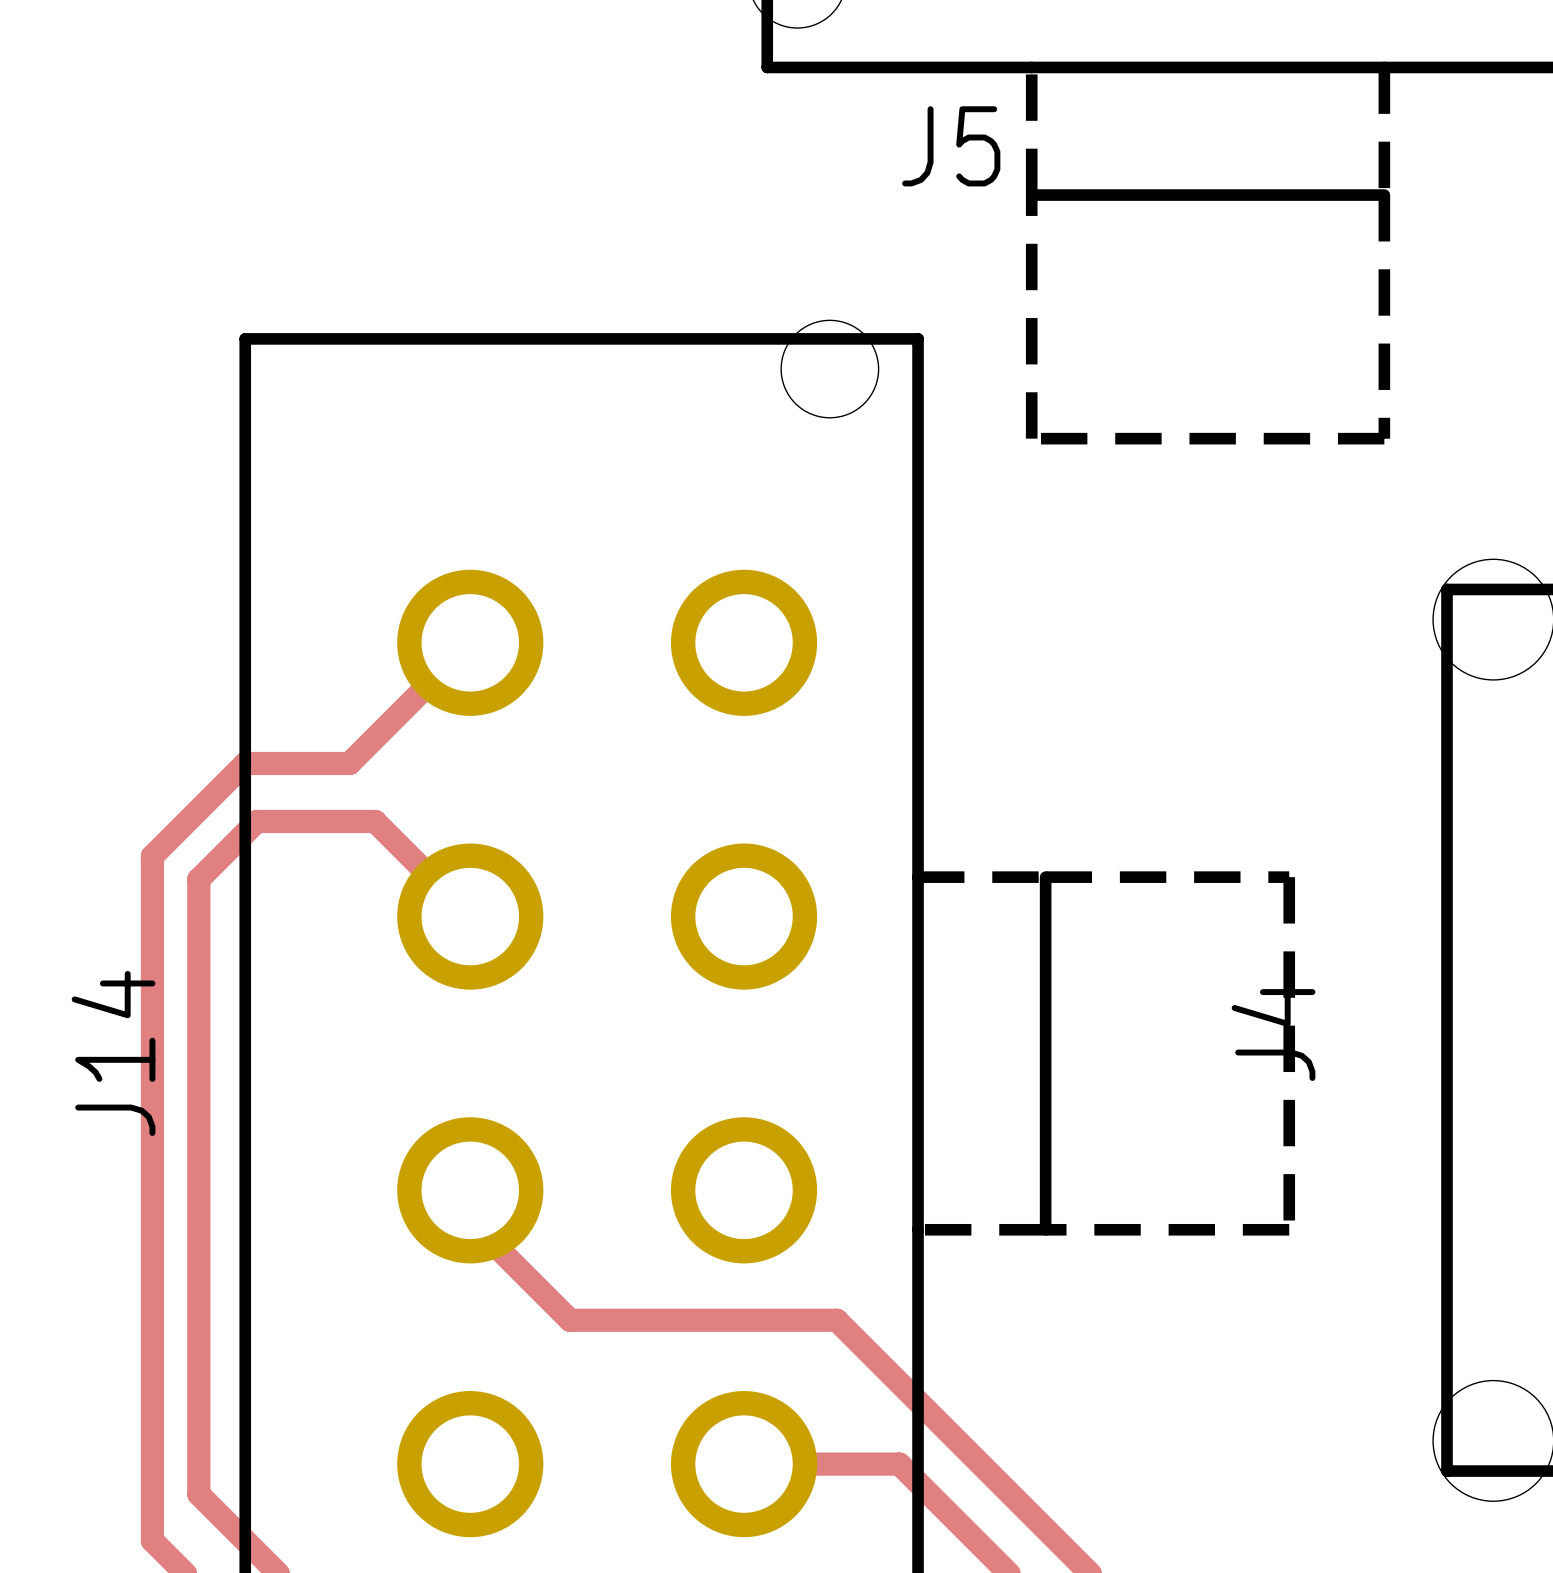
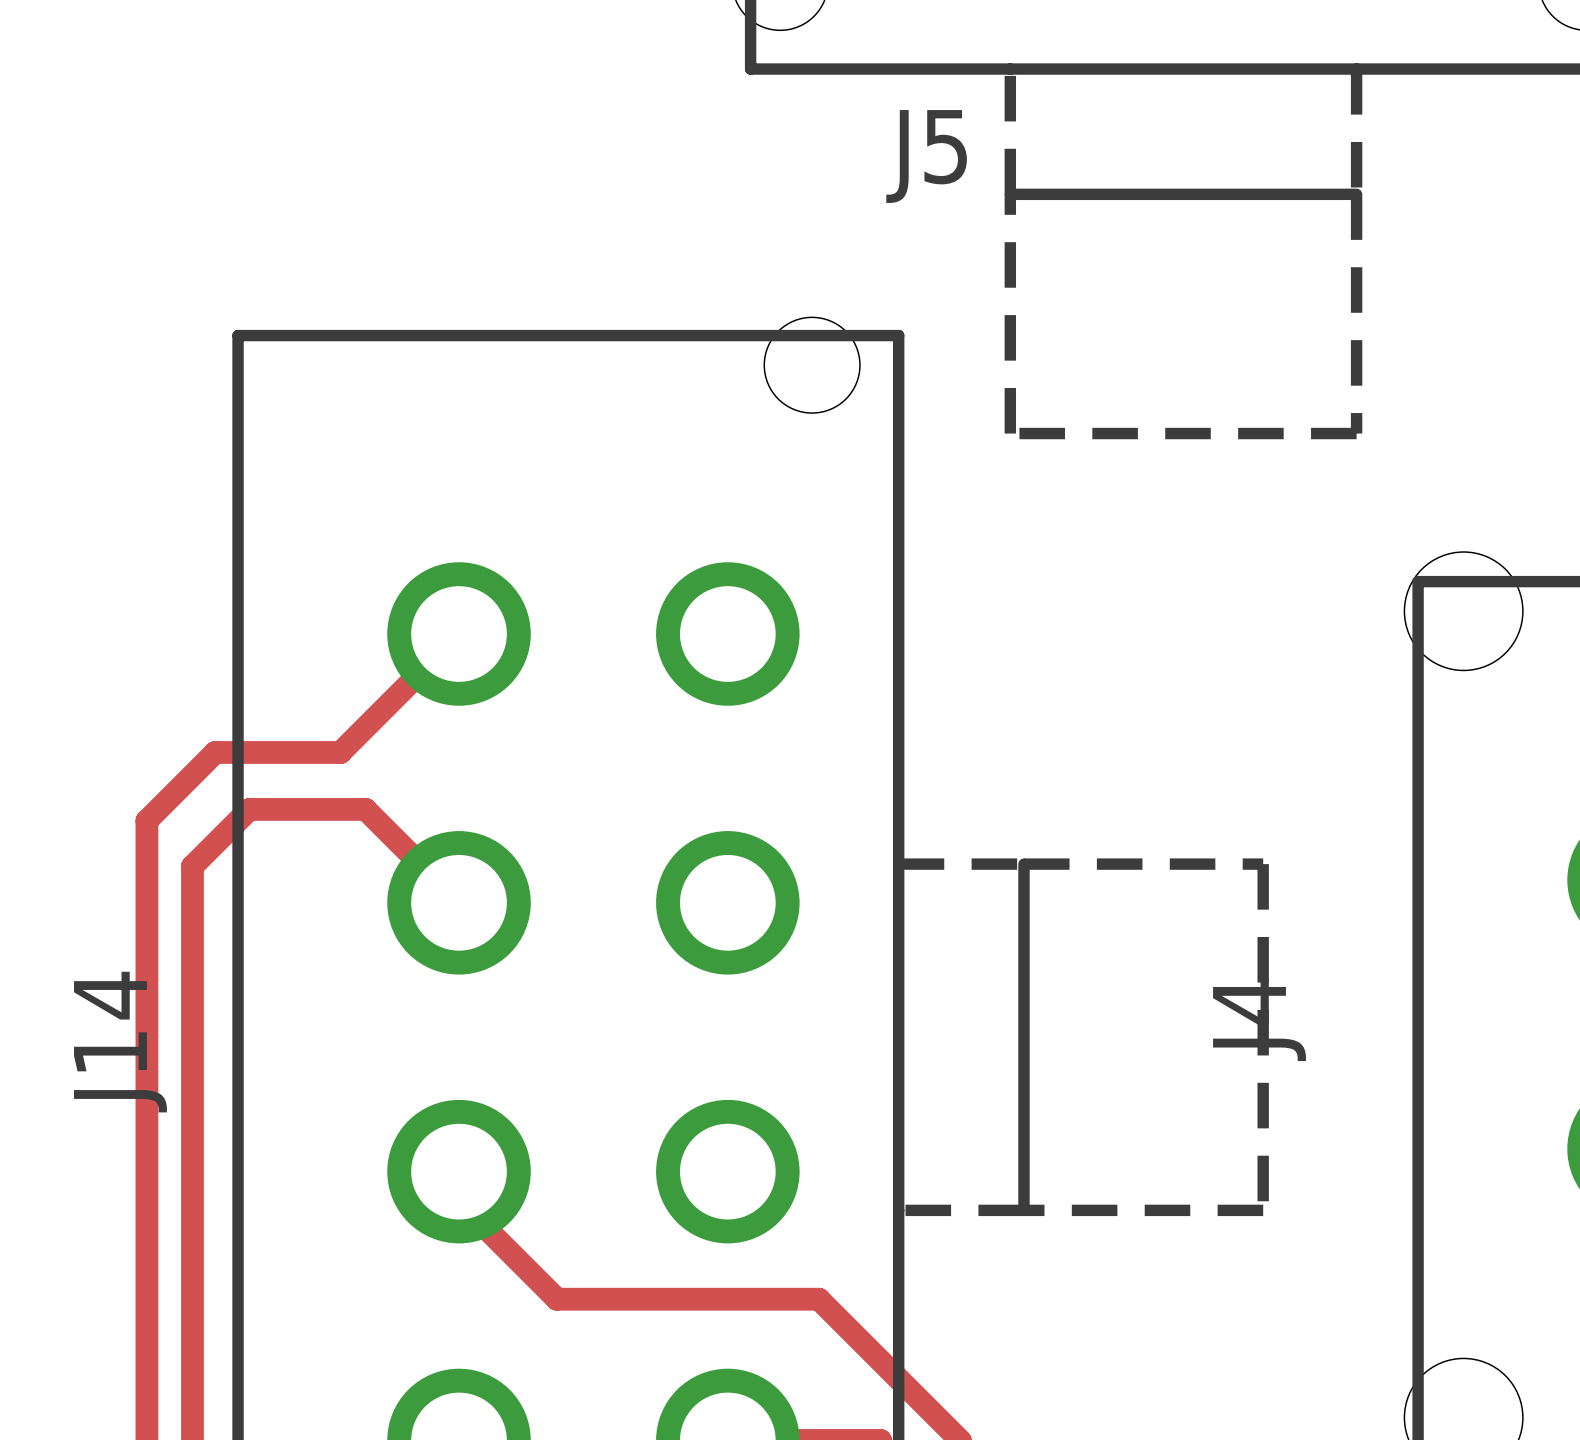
track: (245, 763) (152, 856) -> (238, 752) (215, 752) (146, 820) (146, 843)

